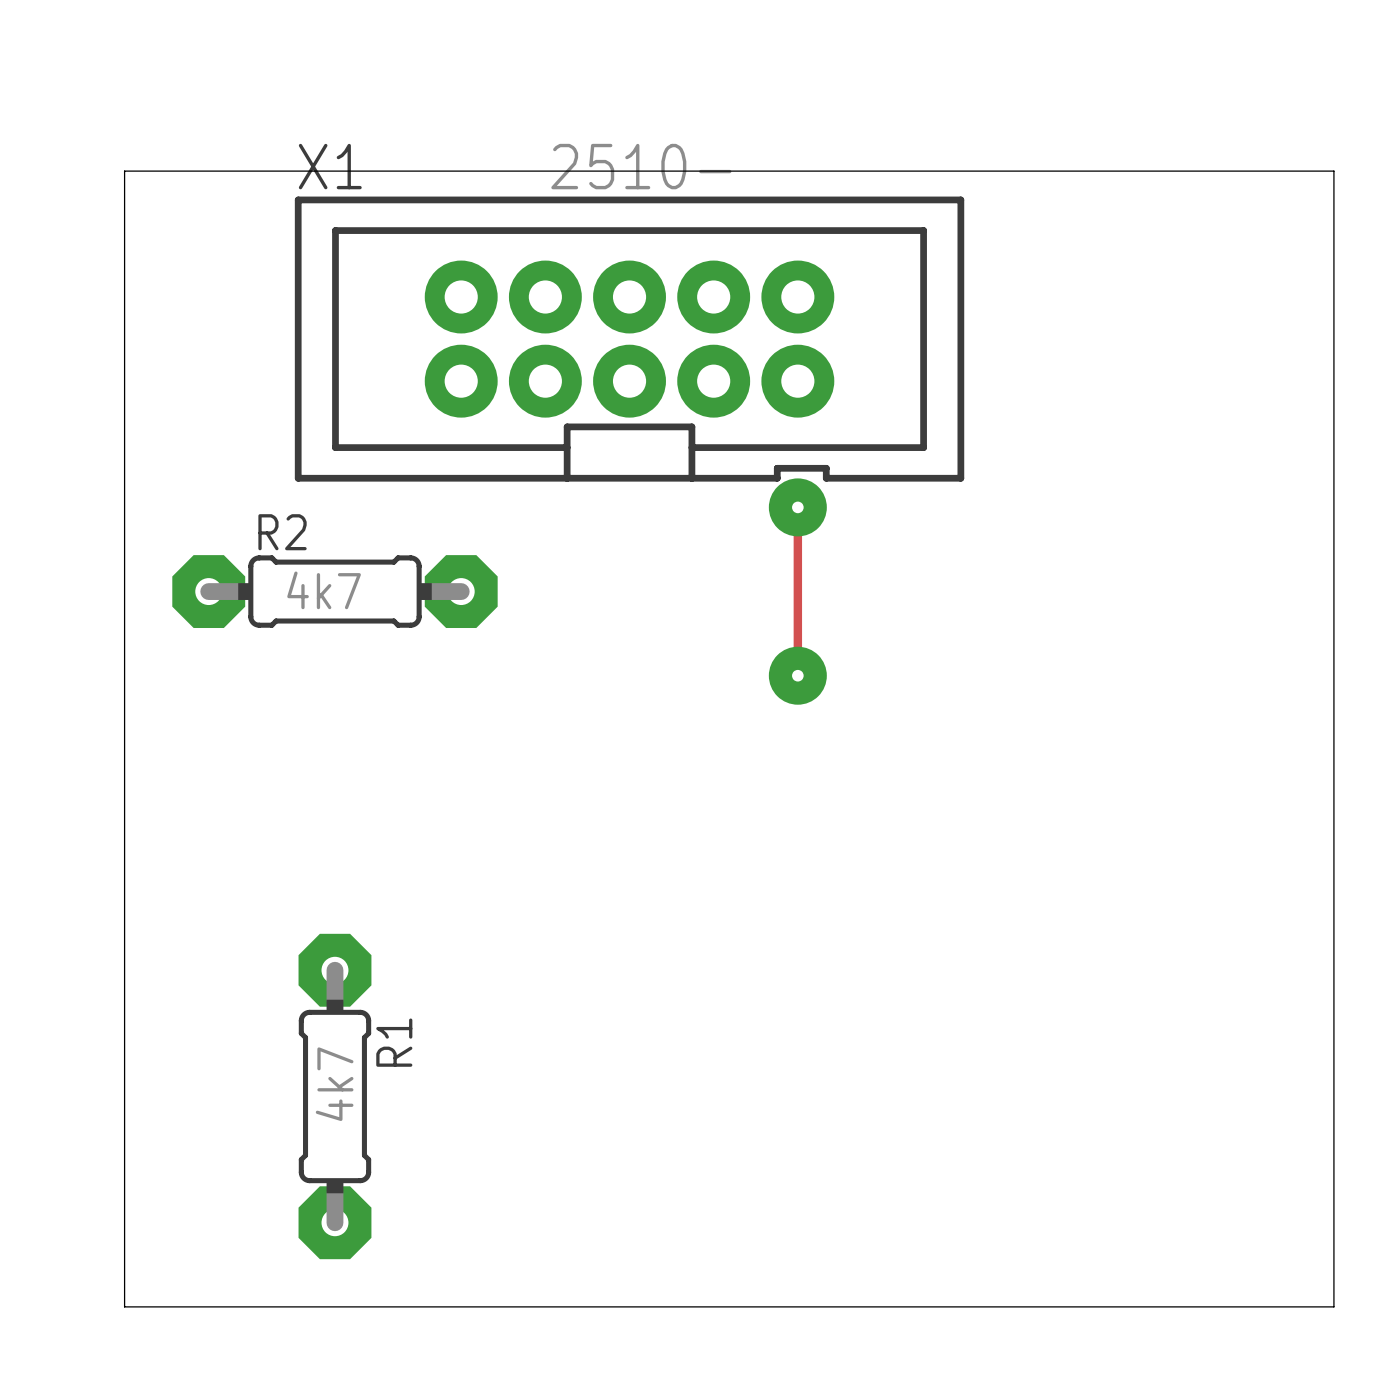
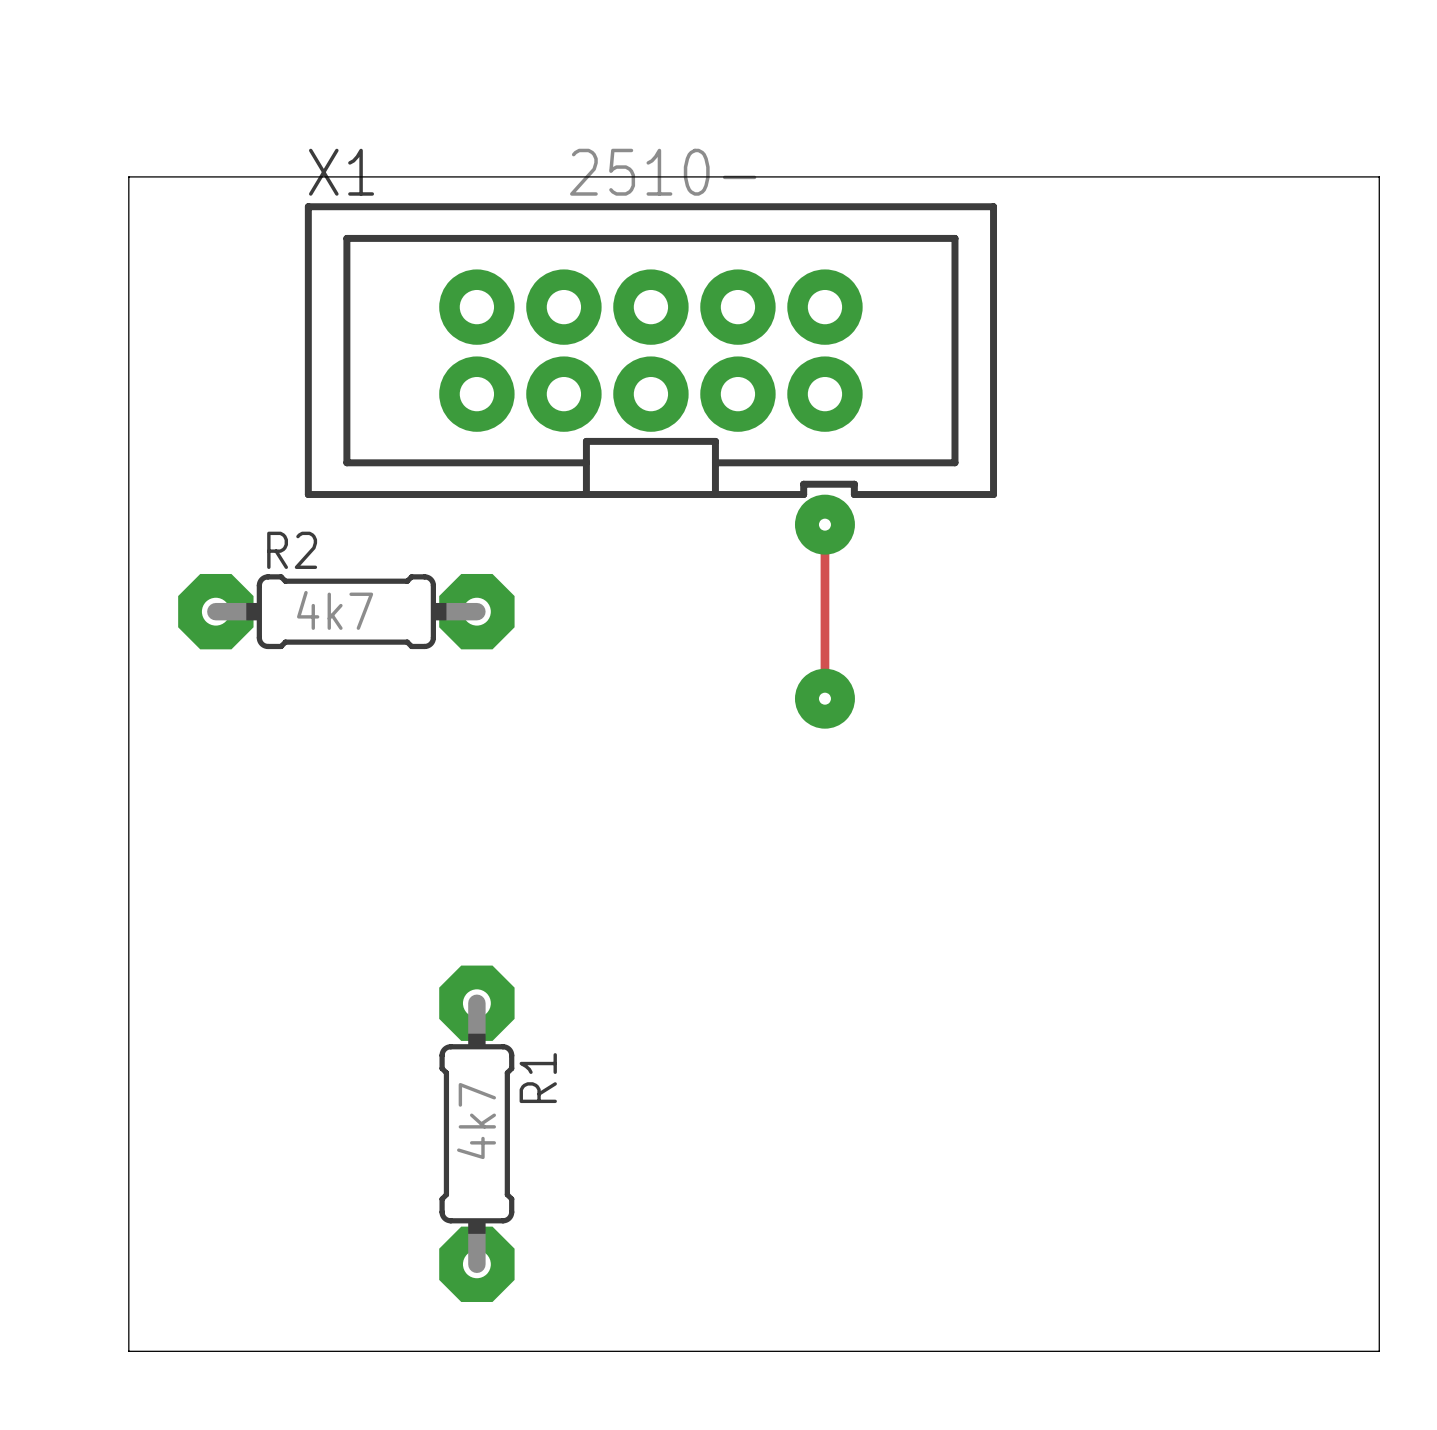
R1 position: (334, 1096) -> (476, 1133)

